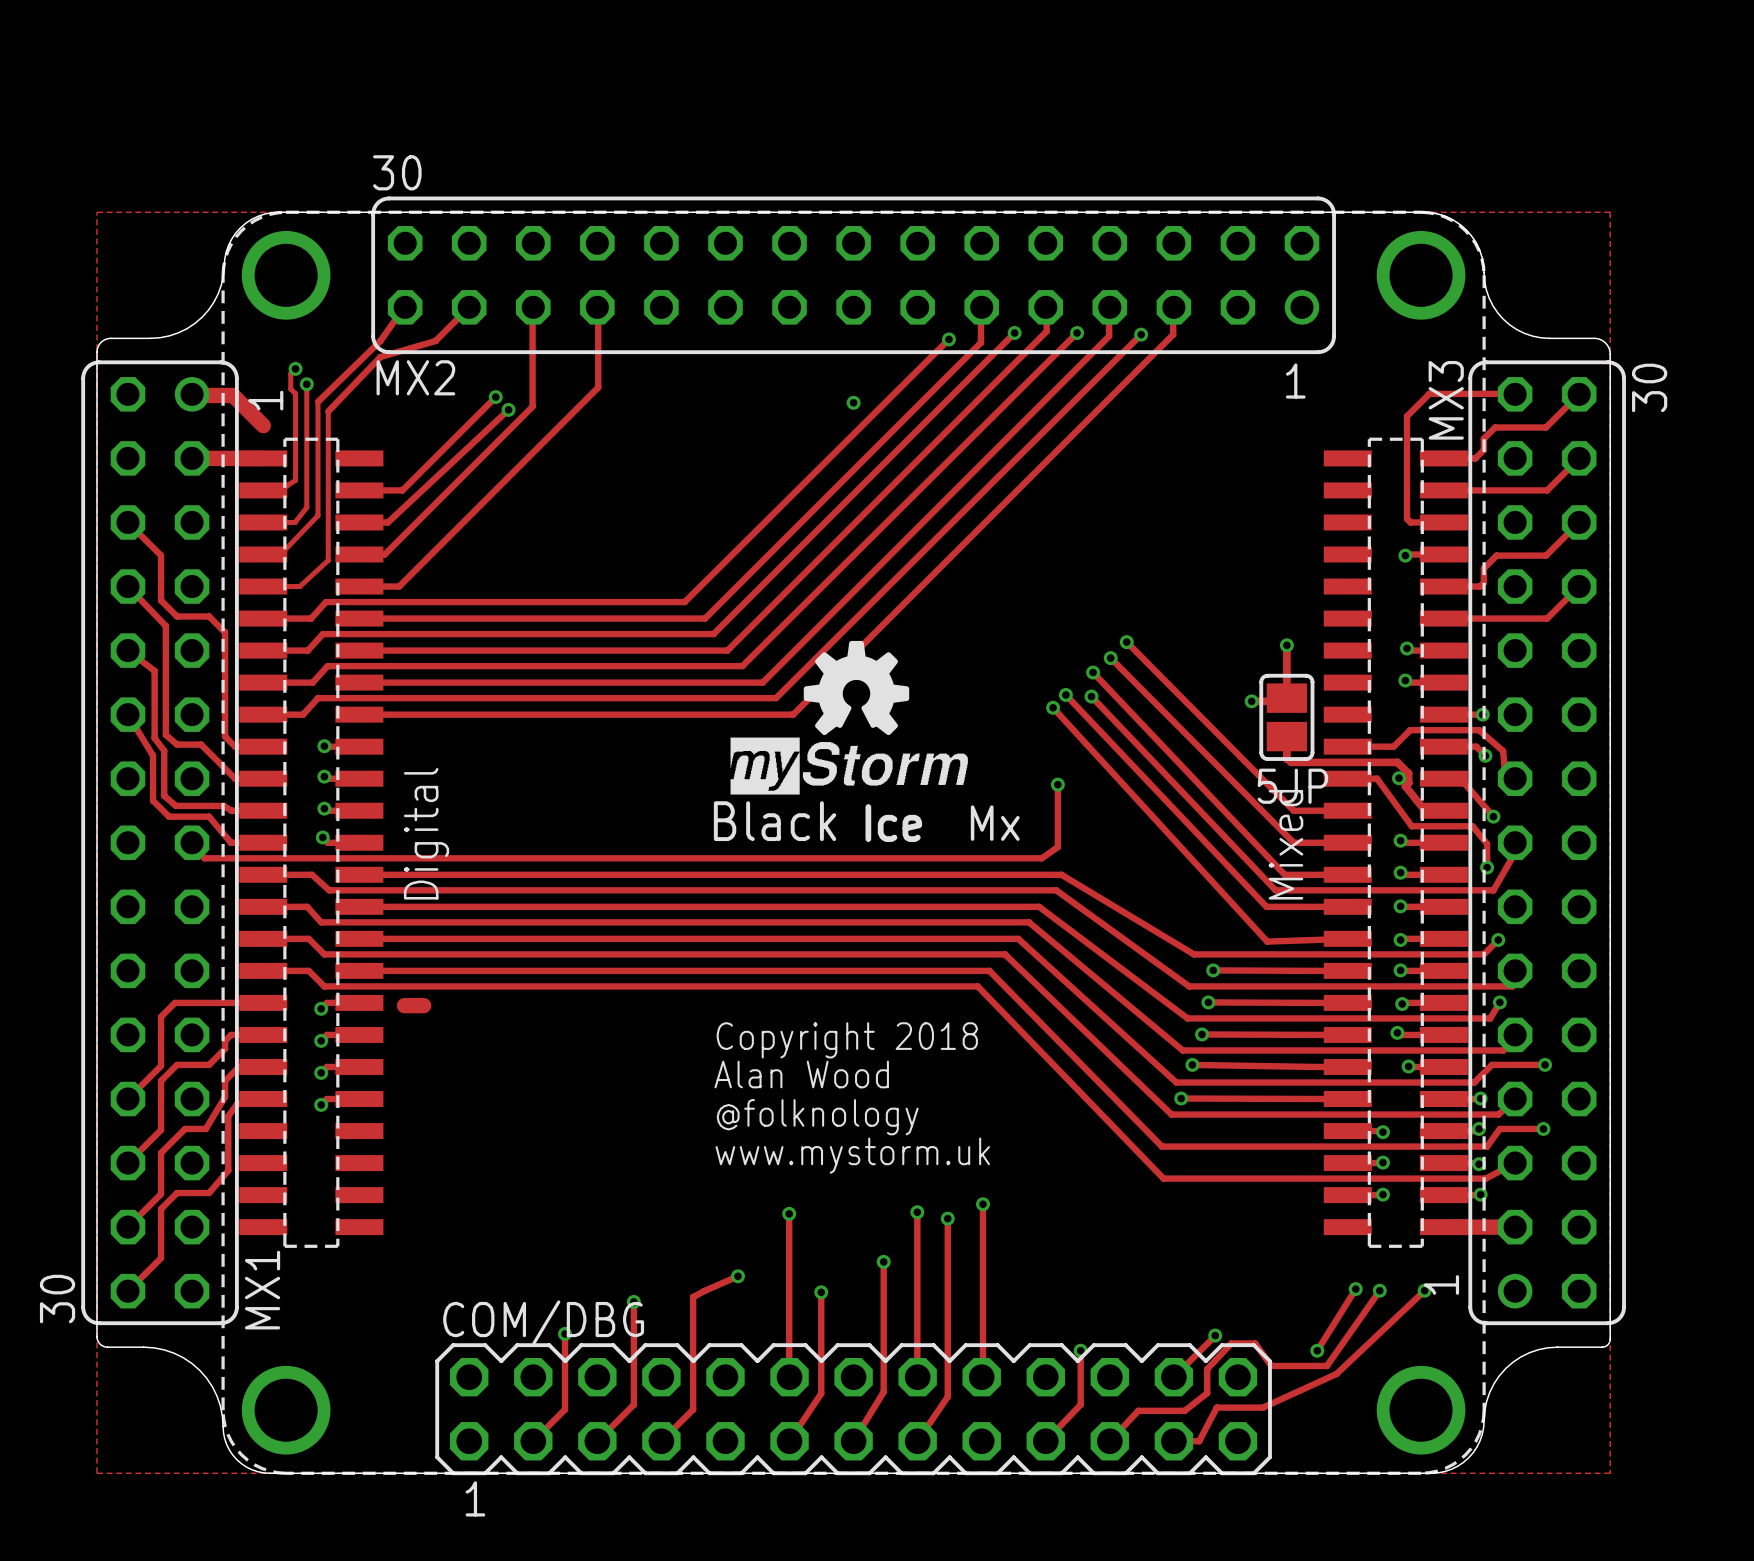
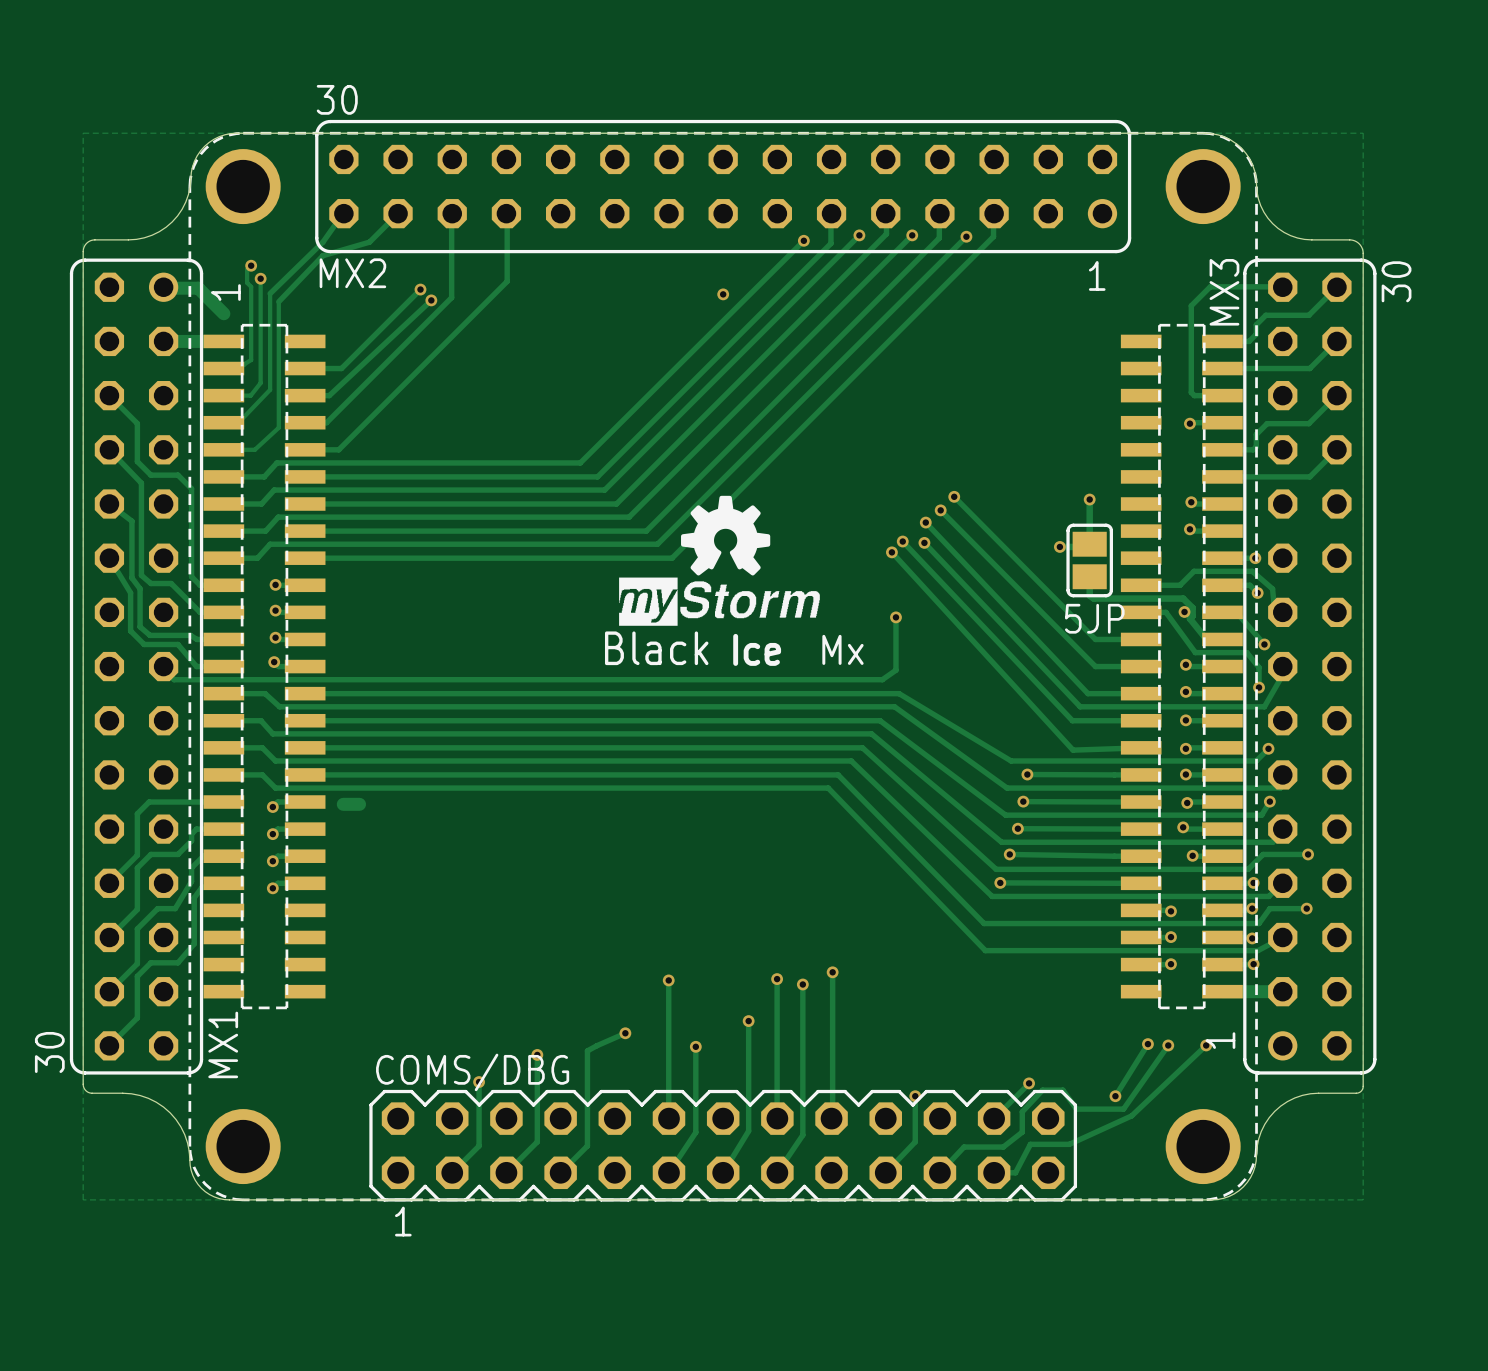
part text: Digital (426, 833) -> none
part text: Mixed (1286, 844) -> none
text: Copyright 2018 (847, 1040) -> none
text: Alan Wood (801, 1074) -> none
text: @folknology (817, 1117) -> none
text: www.mystorm.uk (852, 1155) -> none
COM/DBG name: COM/DBG (543, 1322) -> COMS/DBG (472, 1072)

